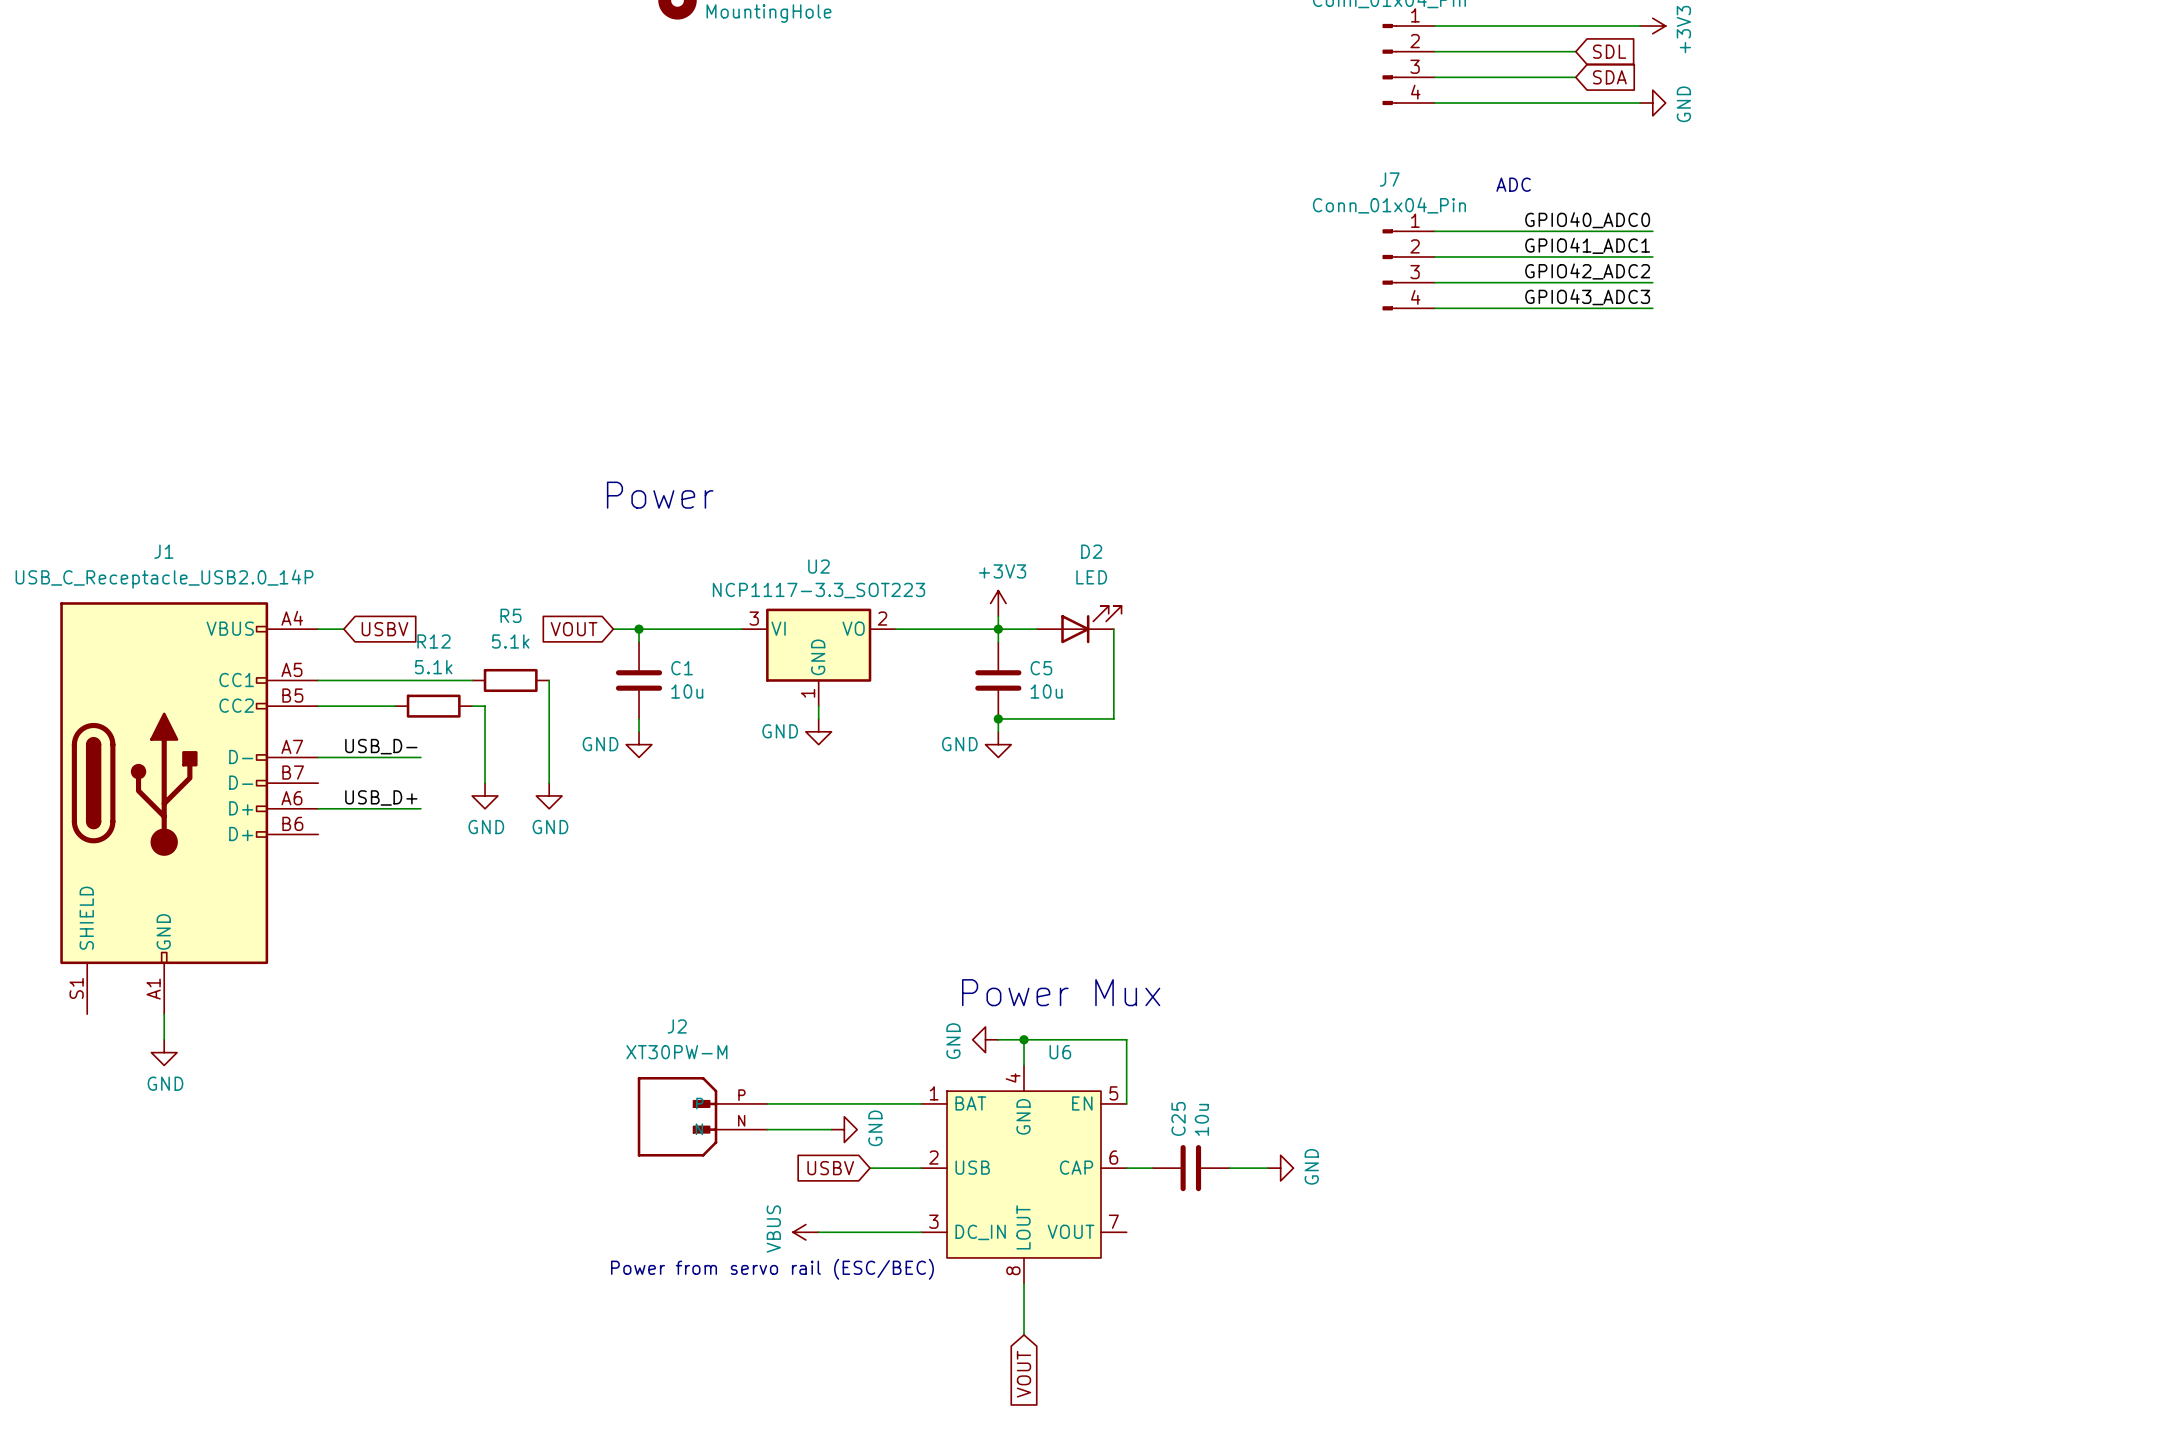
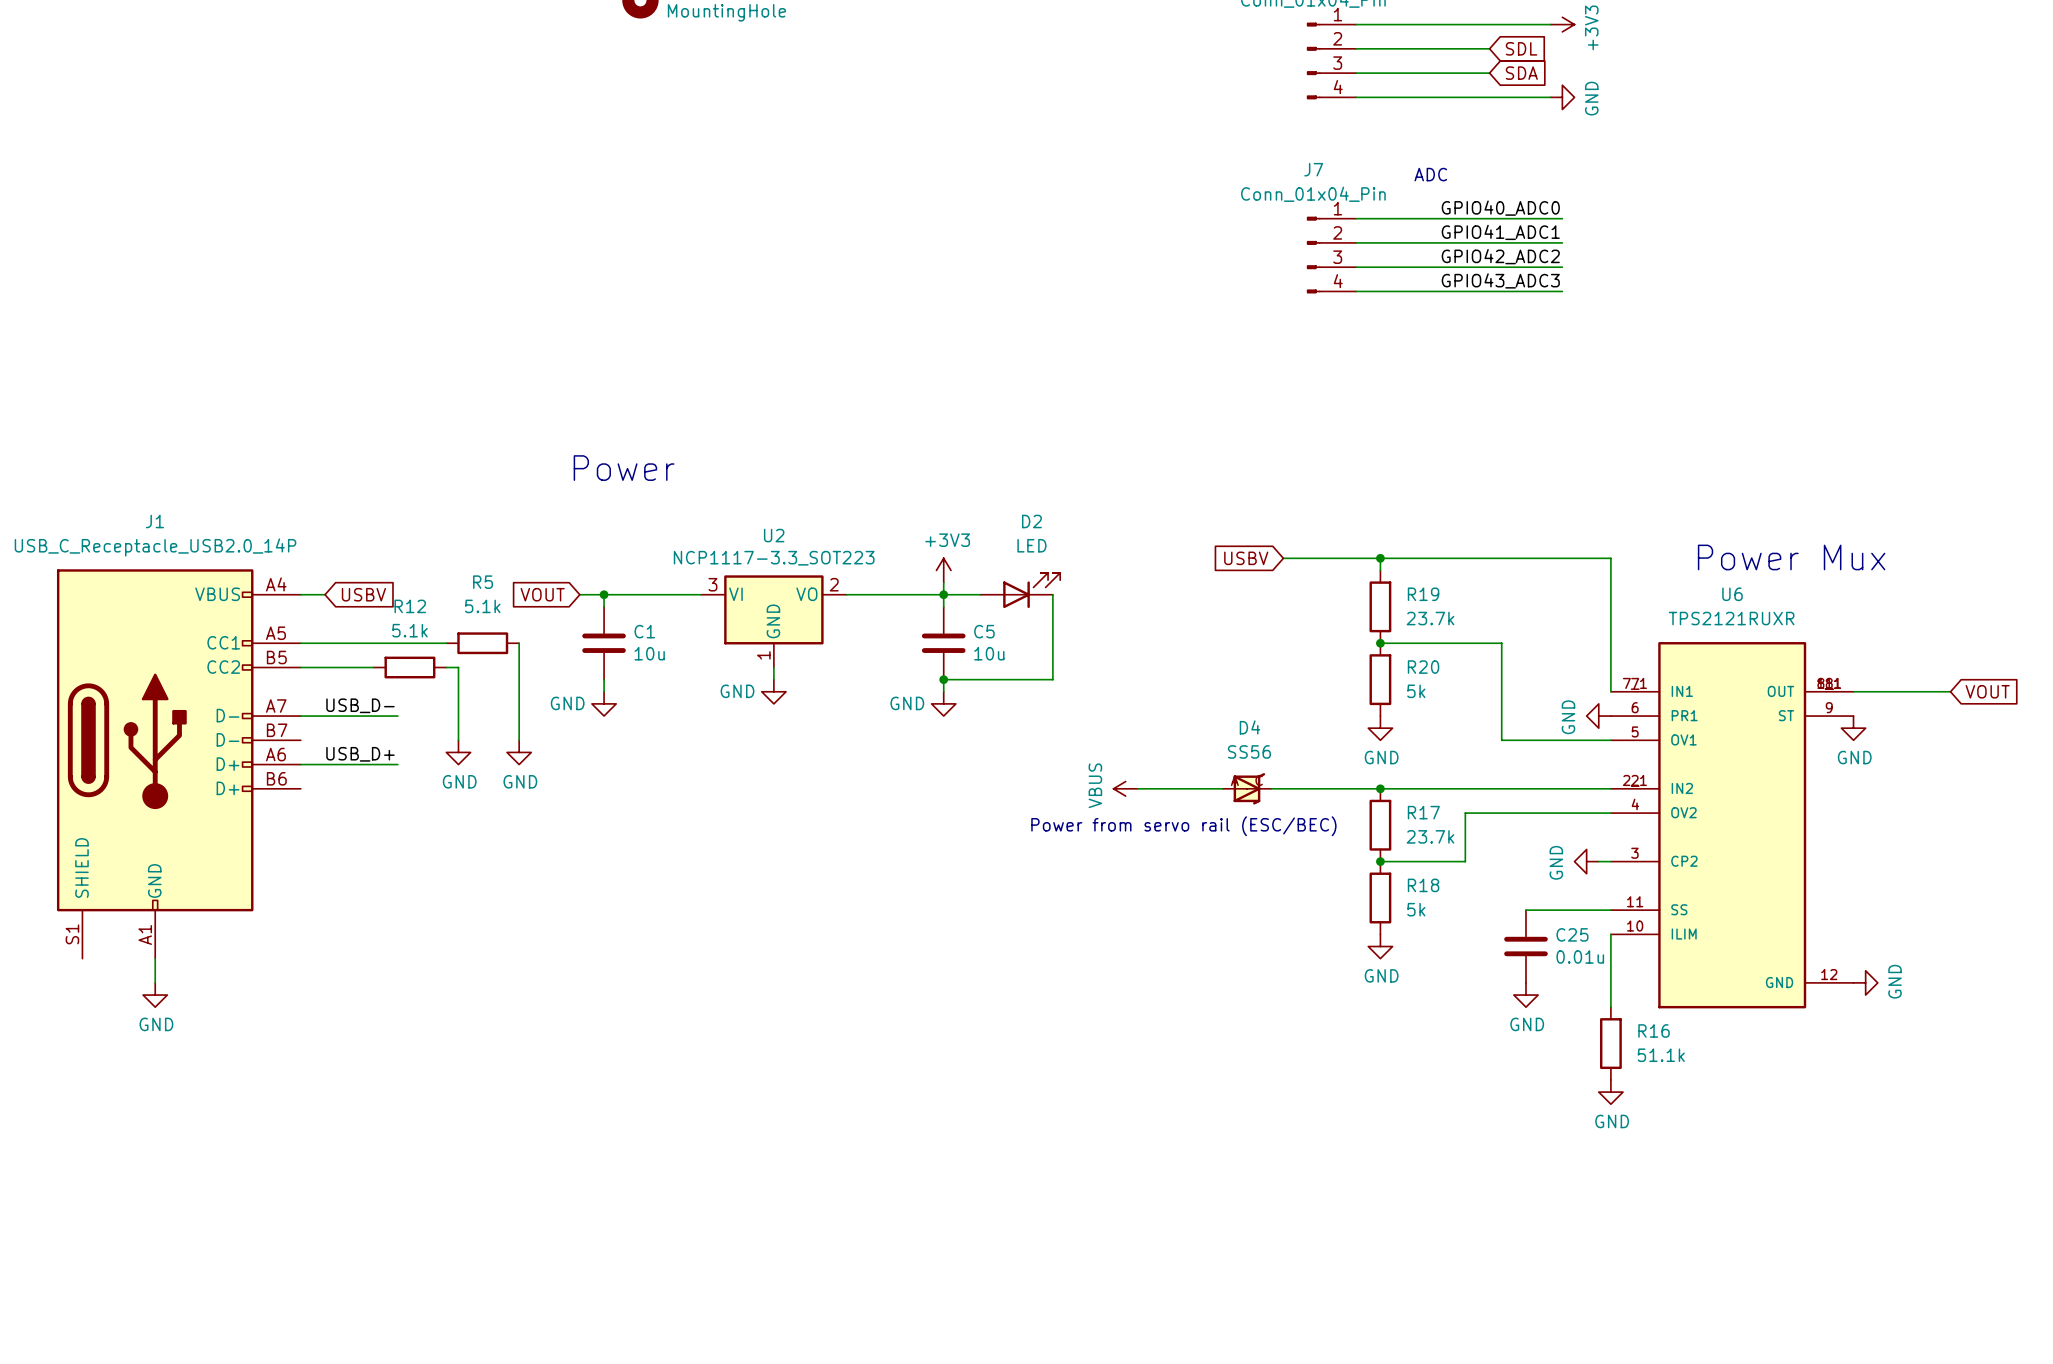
text: none -> Power Mux (1791, 557)
global label: none -> USBV (1246, 558)
wire: none -> (1283, 558) (1610, 558) (1610, 691)
wire: none -> (1380, 558) (1380, 570)
junction: none -> (1380, 558)
R19: none -> 23.7k (1380, 606)
U6 value: none -> TPS2121RUXR (1731, 618)
wire: none -> (1380, 643) (1501, 643) (1501, 740) (1610, 740)
junction: none -> (1380, 643)
R20: none -> 5k (1380, 679)
wire: none -> (1853, 691) (1950, 691)
global label: none -> VOUT (1987, 691)
power symbol: none -> GND (1598, 716)
power symbol: none -> GND (1380, 728)
power symbol: none -> GND (1853, 728)
power symbol: none -> VBUS (1125, 788)
wire: none -> (1137, 788) (1222, 788)
D4: none -> SS56 (1246, 788)
wire: none -> (1271, 788) (1610, 788)
junction: none -> (1380, 788)
wire: none -> (1610, 813) (1465, 813) (1465, 861) (1380, 861)
R17: none -> 23.7k (1380, 825)
text: none -> Power from servo rail (ESC/BEC) (1183, 826)
junction: none -> (1380, 861)
power symbol: none -> GND (1586, 861)
wire: none -> (1598, 861) (1610, 861)
R18: none -> 5k (1380, 897)
wire: none -> (1525, 910) (1610, 910)
wire: none -> (1610, 934) (1610, 1007)
text: Power Mux (1061, 992) -> none
power symbol: none -> GND (1380, 946)
power symbol: GND (985, 1039) -> none
wire: (998, 1039) (1126, 1039) (1126, 1103) -> none
wire: (1024, 1039) (1024, 1065) -> none
junction: (1024, 1039) -> none
power symbol: none -> GND (1865, 982)
U6 name position: U6 (1060, 1052) -> U6 (1732, 594)
power symbol: none -> GND (1525, 995)
U6 symbol: [921, 1065, 1127, 1284] -> [1610, 642, 1854, 1009]
wire: (767, 1103) (921, 1103) -> none
R16: none -> 51.1k (1610, 1043)
J2: XT30PW-M (702, 1116) -> none
C25 value: 10u (1201, 1119) -> 0.01u (1580, 956)
wire: (767, 1129) (831, 1129) -> none
power symbol: GND (844, 1129) -> none
power symbol: none -> GND (1610, 1092)
global label: USBV (830, 1168) -> none
wire: (870, 1168) (921, 1168) -> none
wire: (1126, 1168) (1152, 1168) -> none
C25 rotation: 0° (1190, 1168) -> 90° clockwise (1525, 946)
C25 position: (1190, 1168) -> (1525, 946)
wire: (1229, 1168) (1267, 1168) -> none
power symbol: GND (1280, 1168) -> none
power symbol: VBUS (805, 1232) -> none
wire: (818, 1232) (921, 1232) -> none
text: Power from servo rail (ESC/BEC) (772, 1269) -> none
wire: (1024, 1283) (1024, 1334) -> none
global label: VOUT (1024, 1374) -> none

